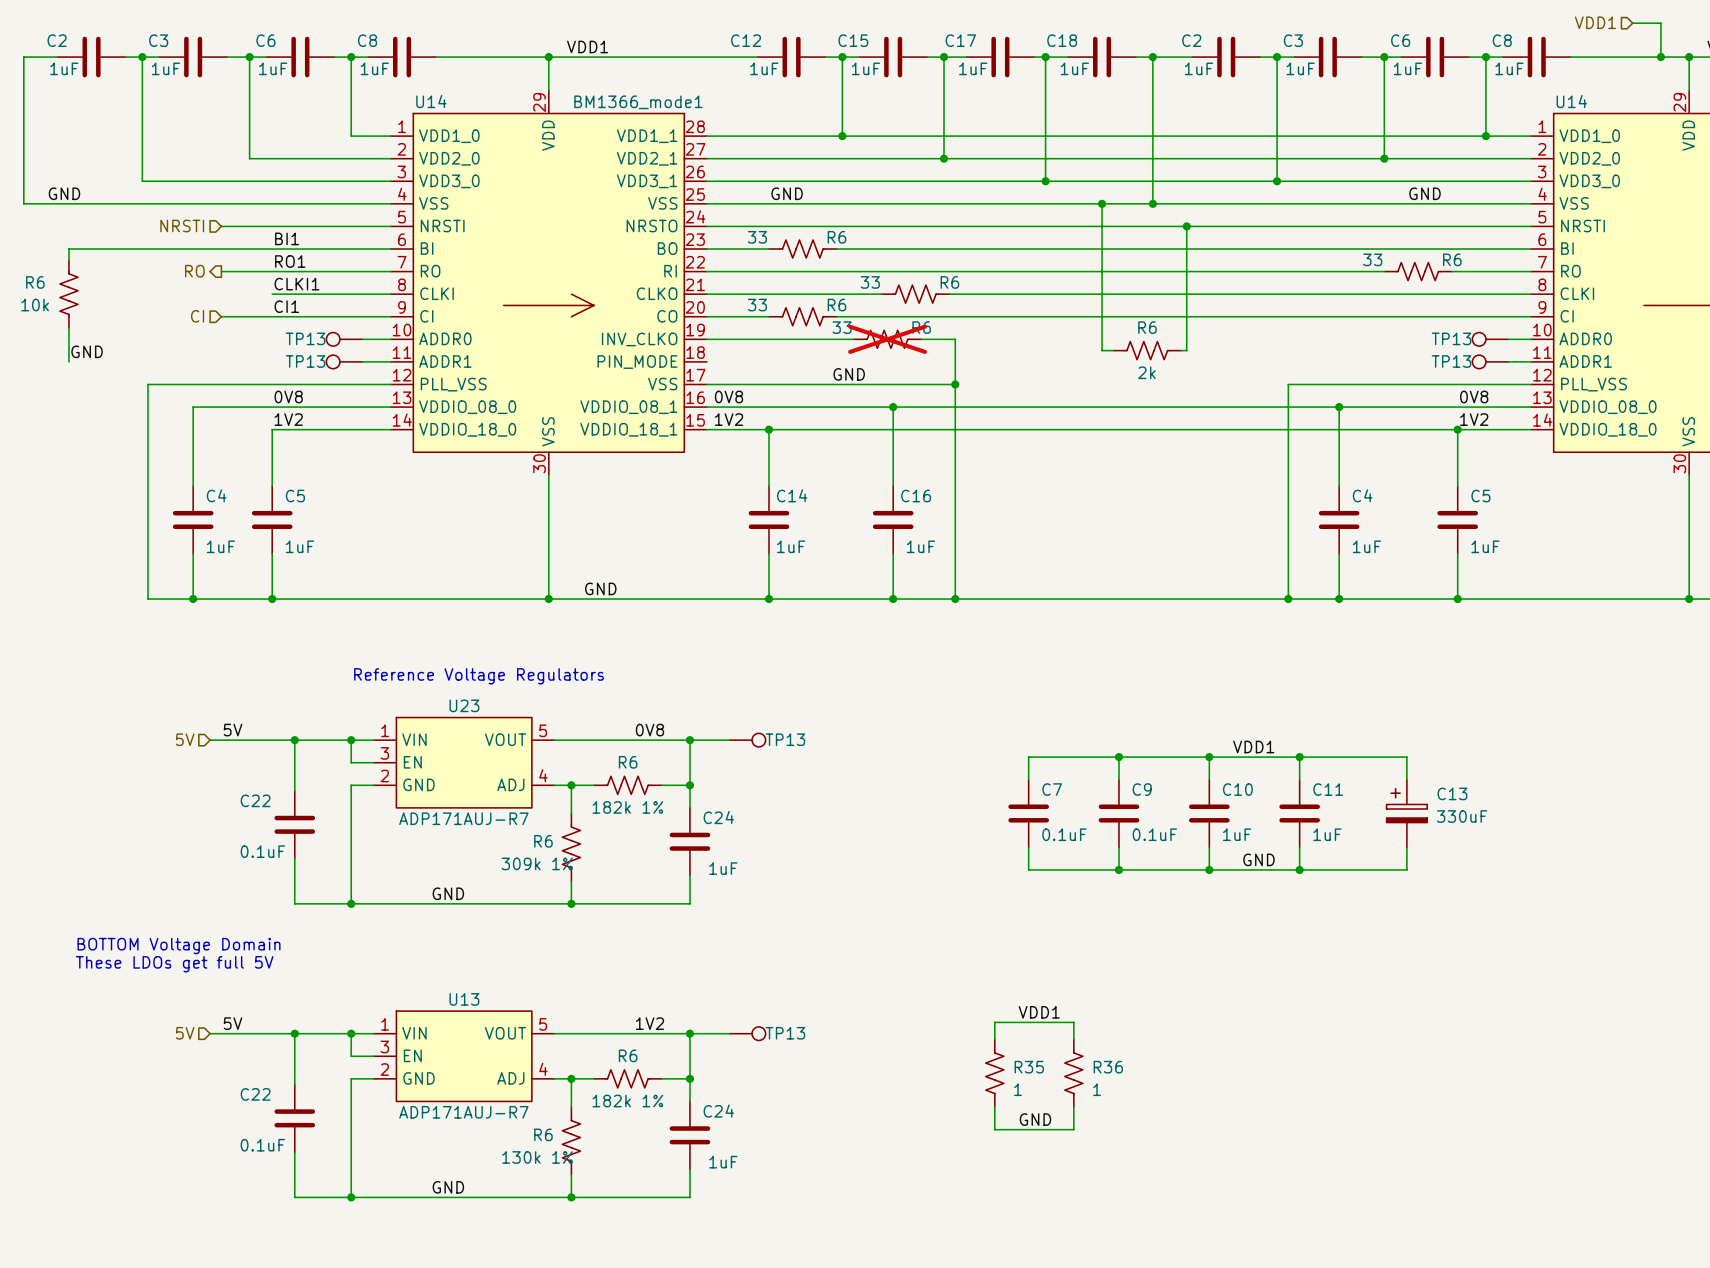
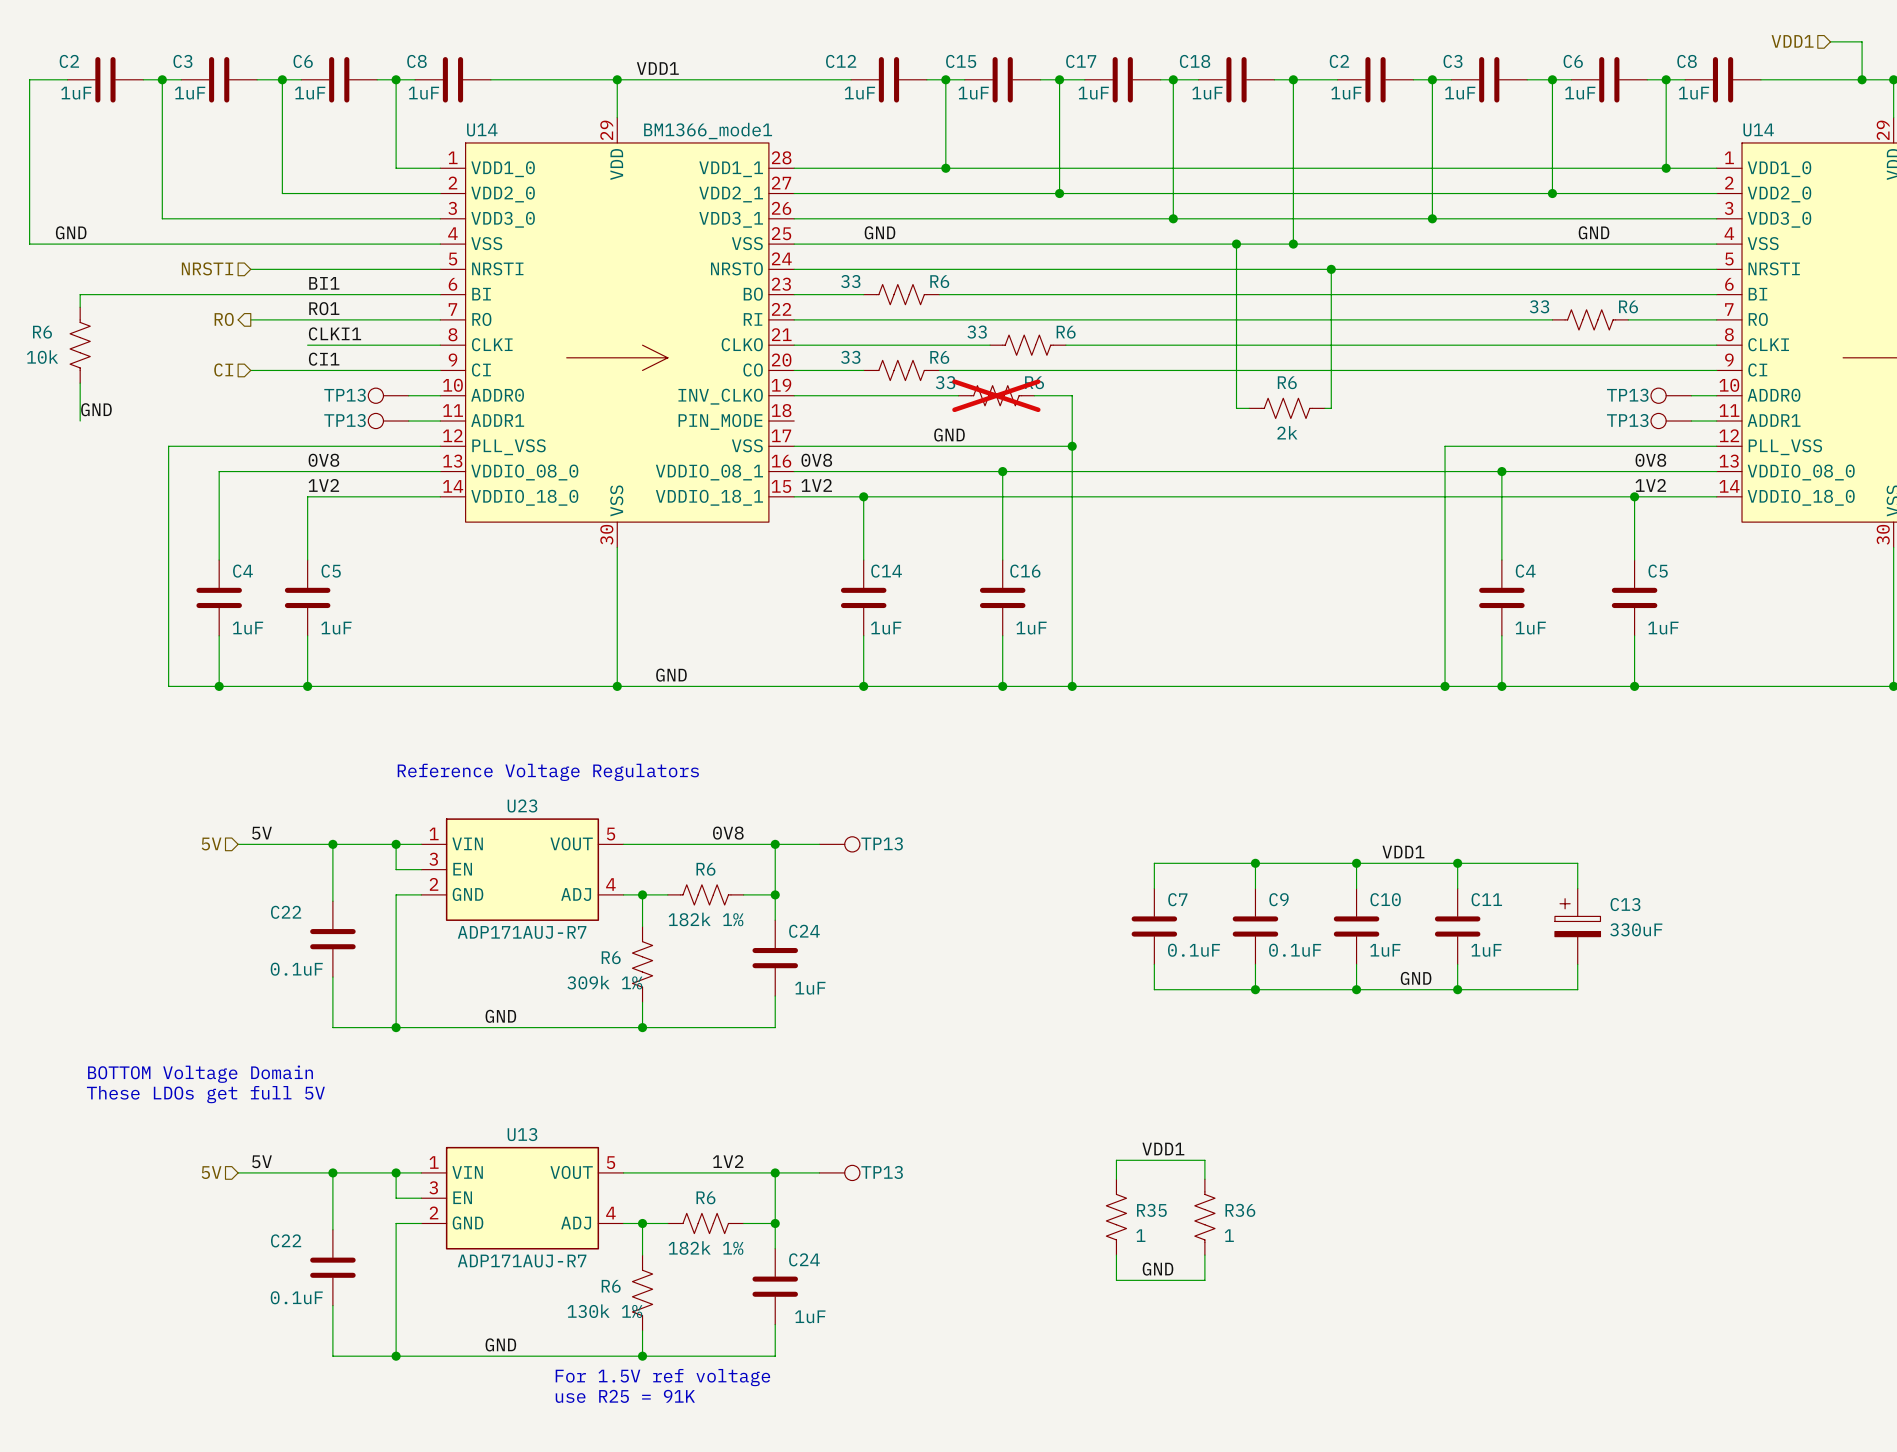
text: none -> For 1.5V ref voltage (662, 1377)
text: none -> use R25 = 91K (625, 1396)

